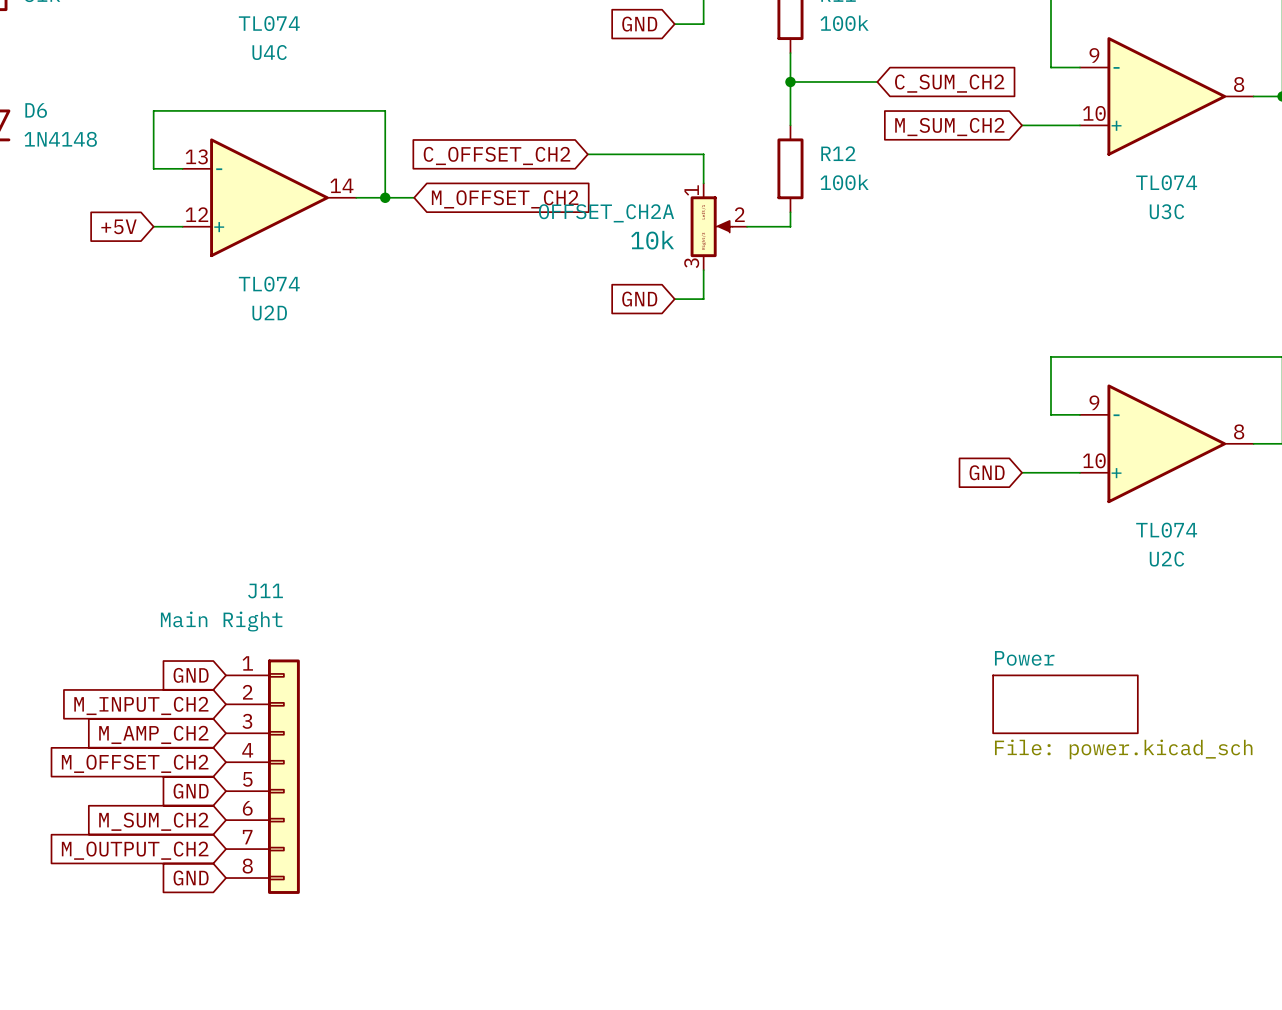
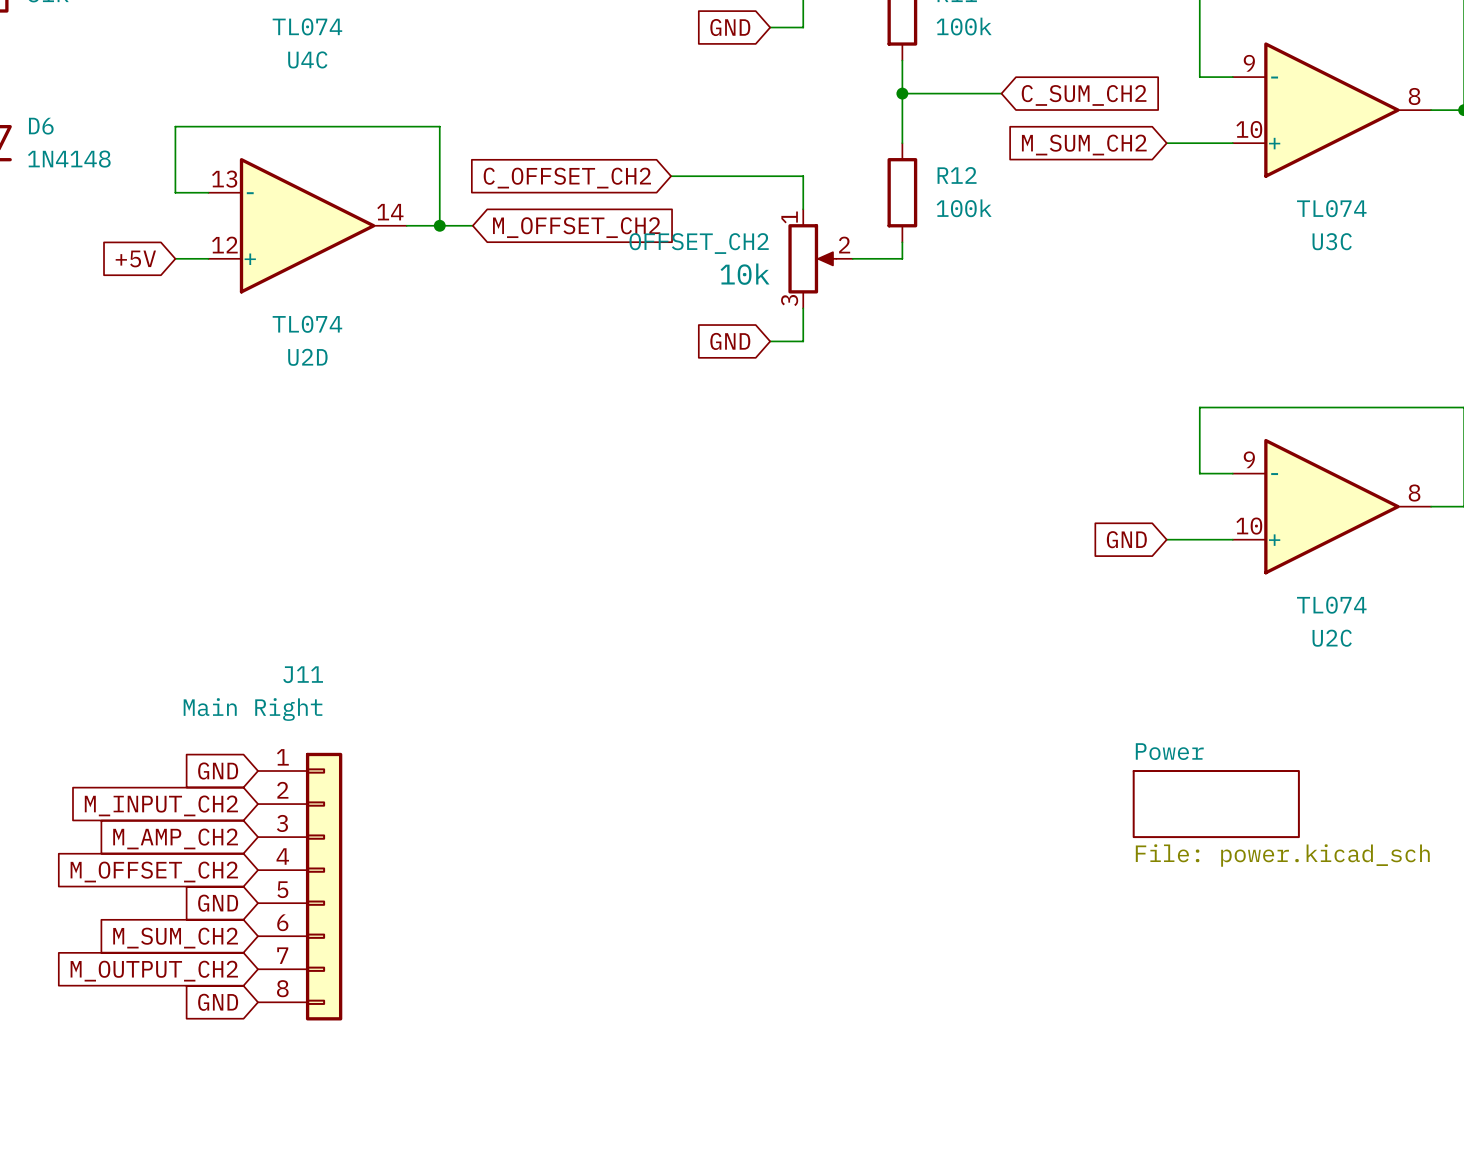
OFFSET_CH2A: (718, 226) -> none
OFFSET_CH2: none -> (820, 258)

